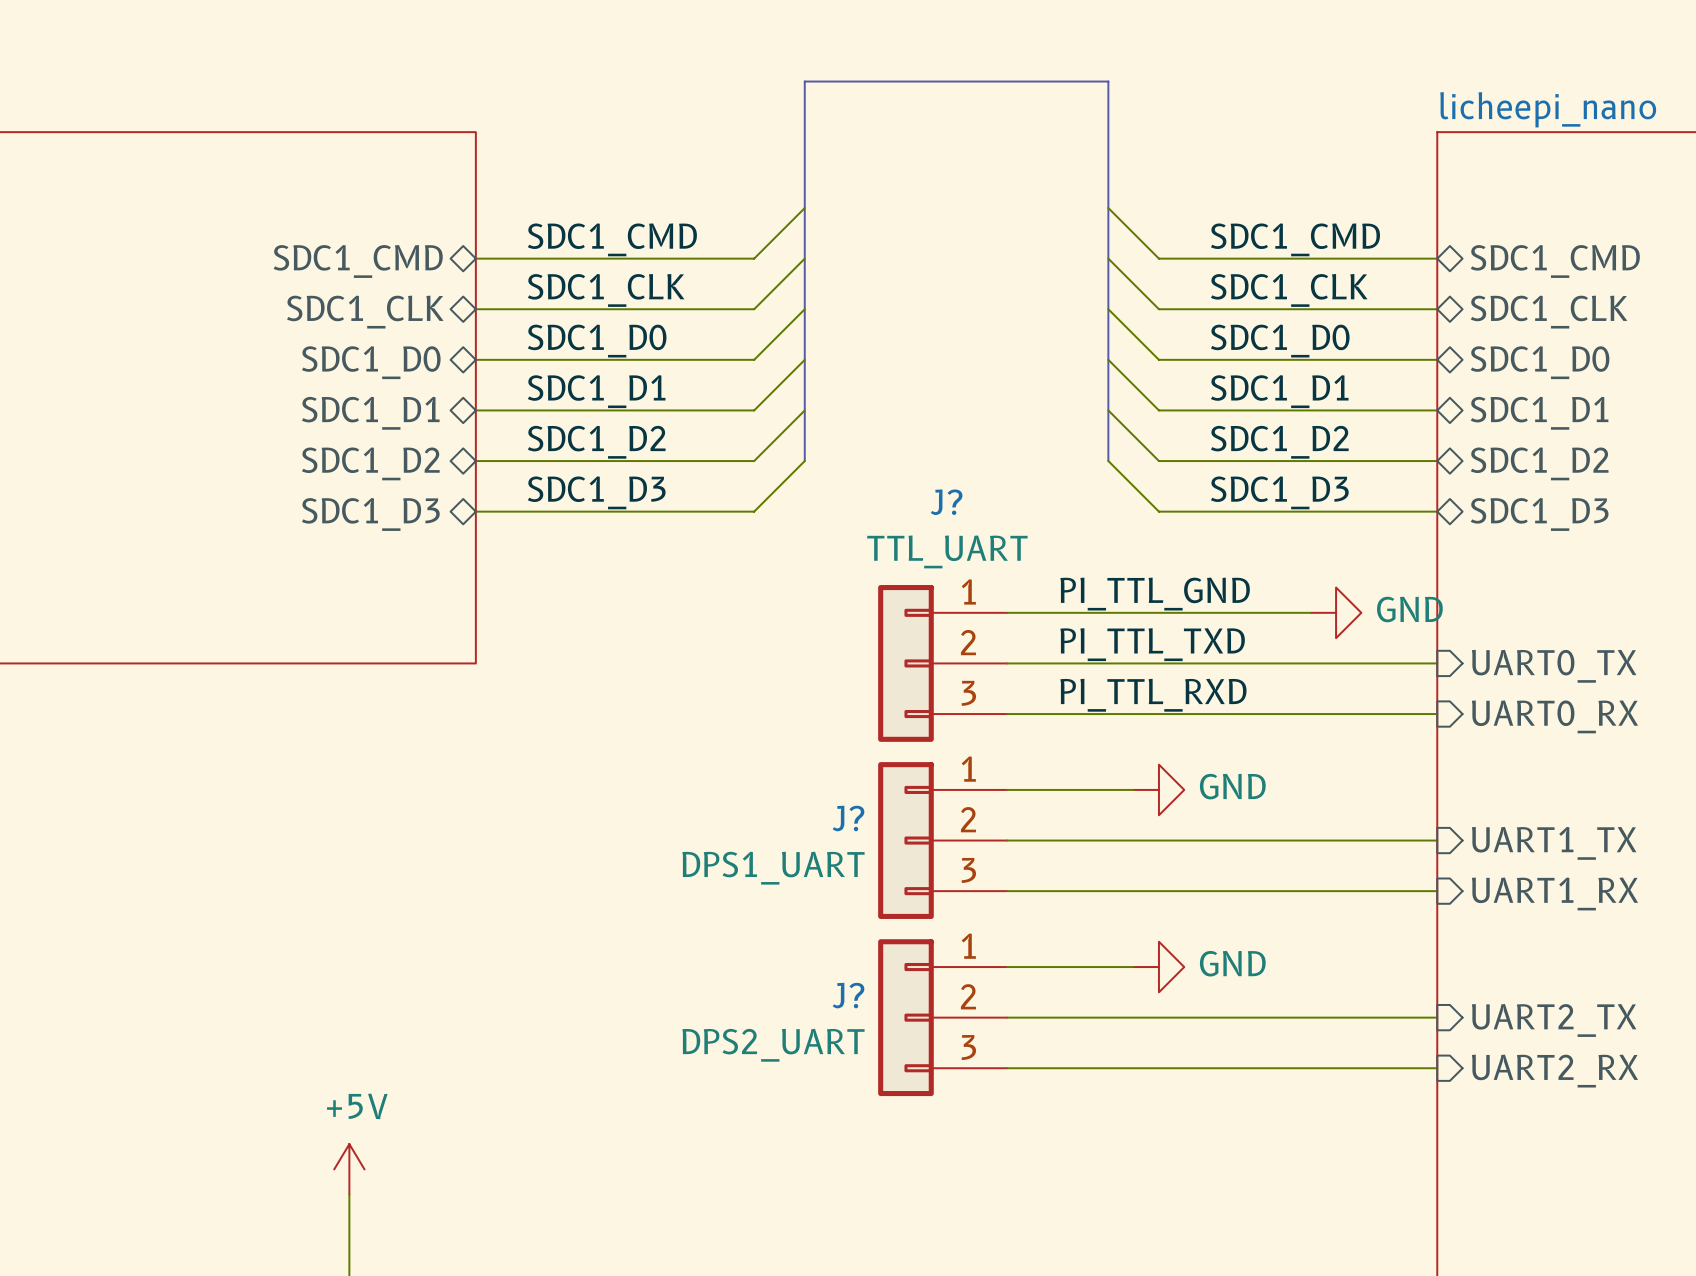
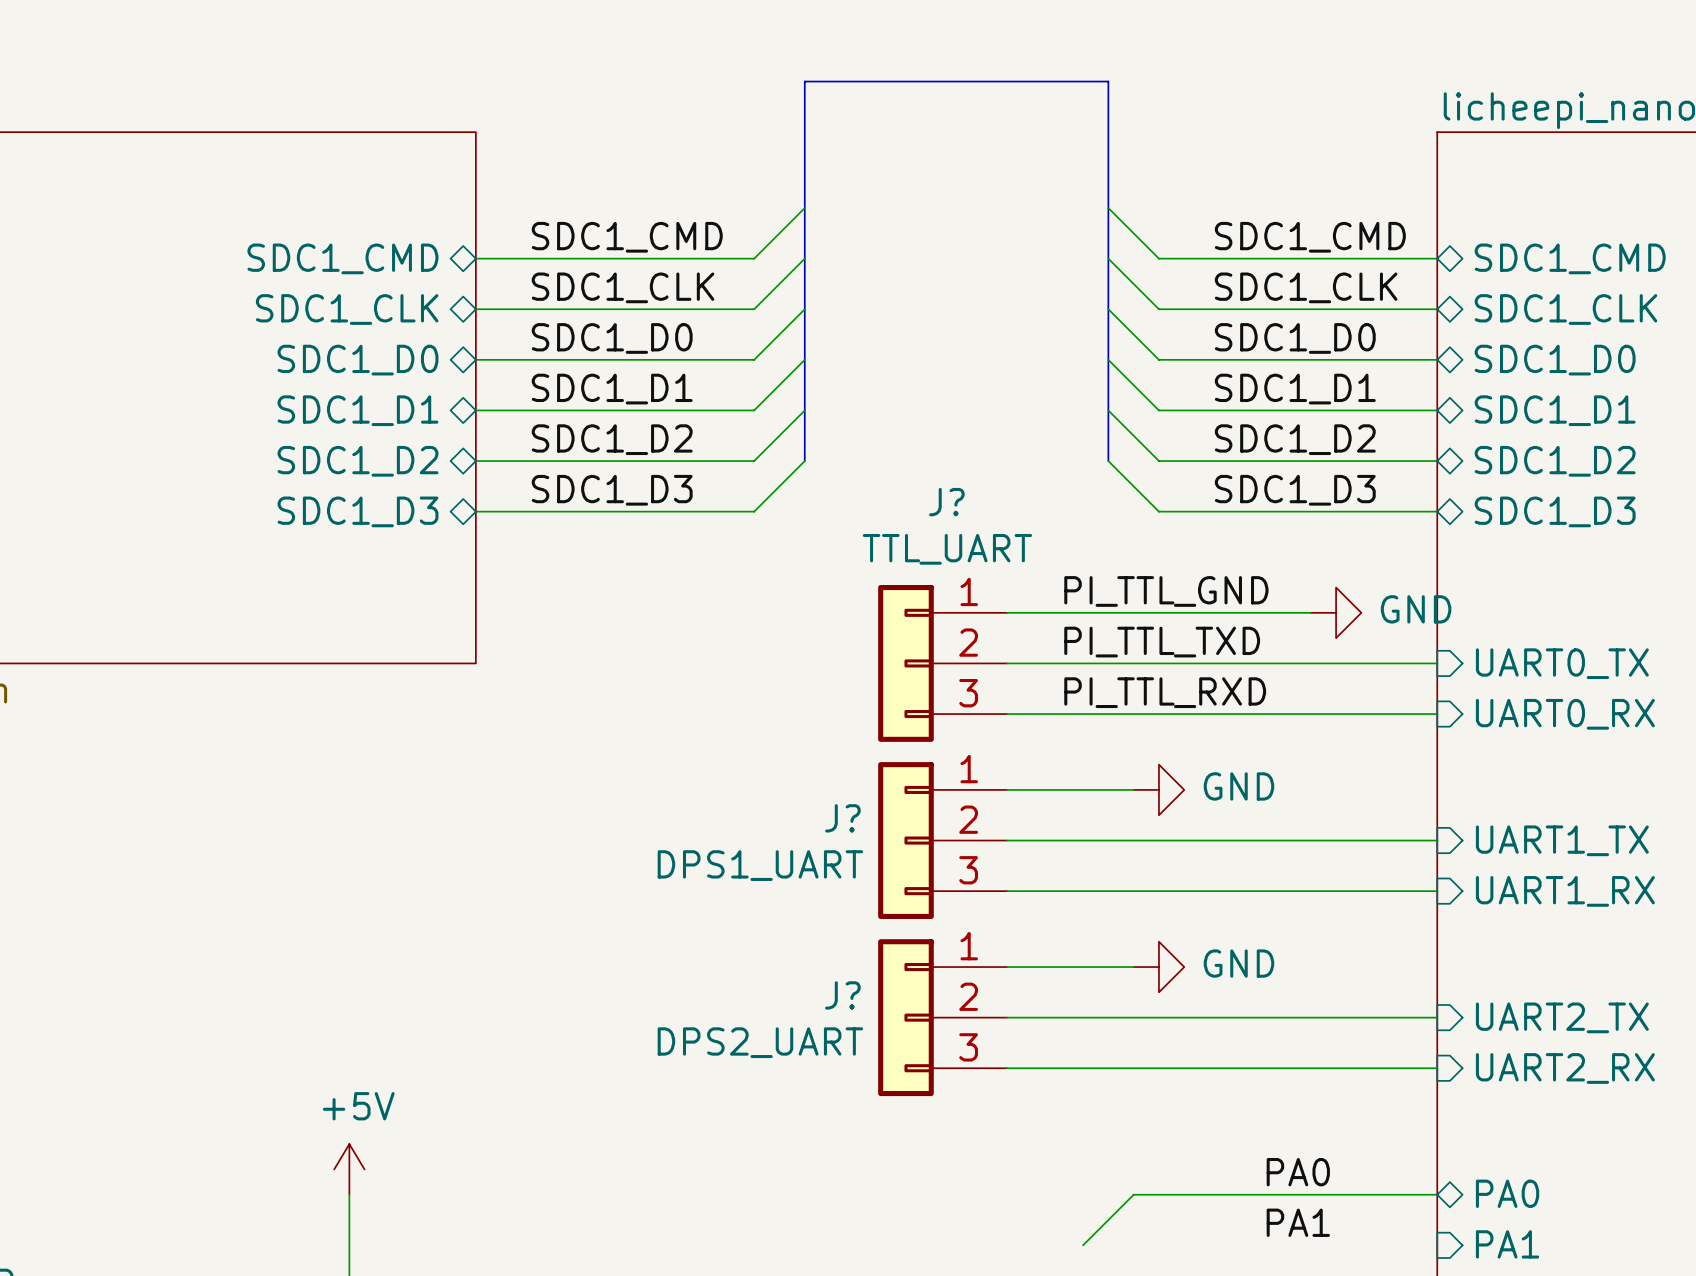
label: none -> PA0 (1298, 1172)
sheet pin: none -> PA0 (1507, 1193)
wire: none -> (1437, 1194) (1133, 1194) (1083, 1245)
label: none -> PA1 (1298, 1222)
sheet pin: none -> PA1 (1507, 1244)

